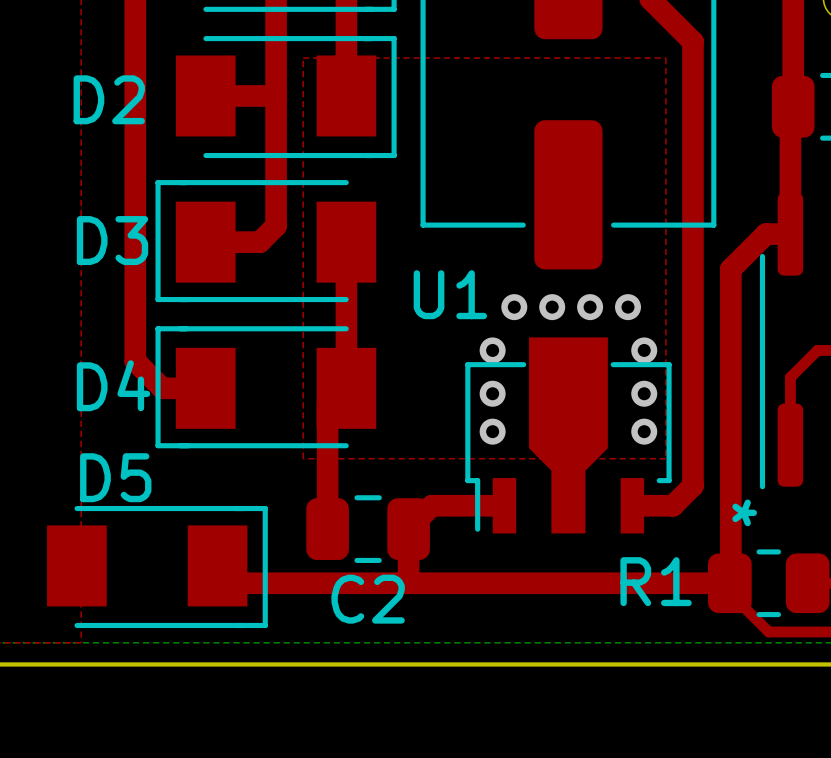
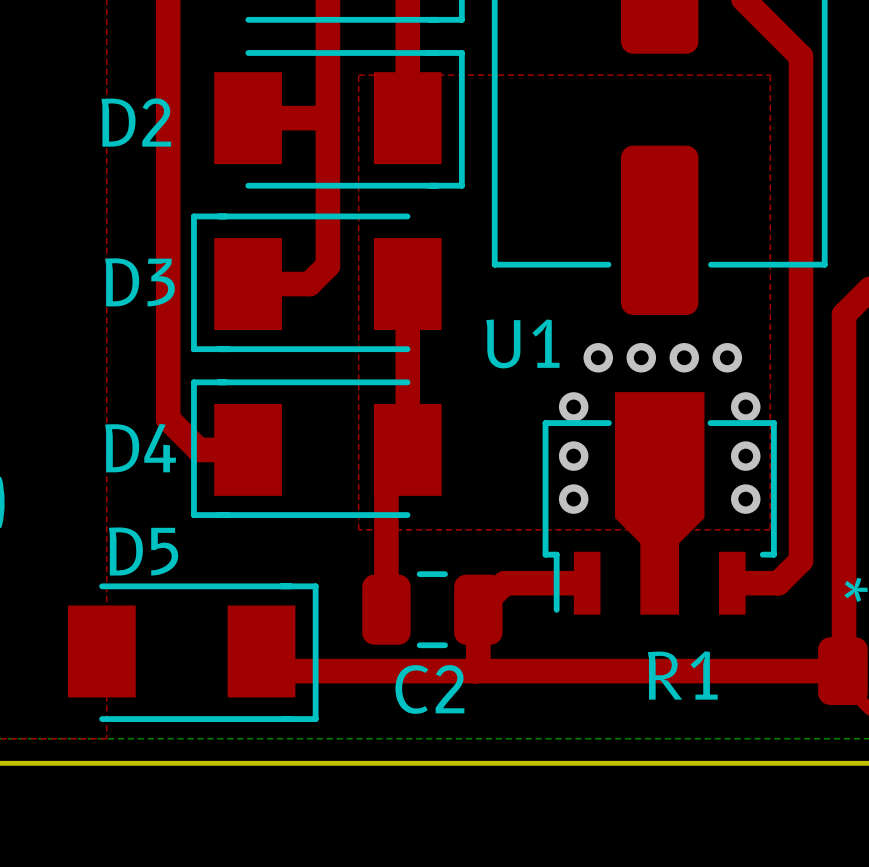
R1 name position: R1 (656, 581) -> R1 (682, 675)

